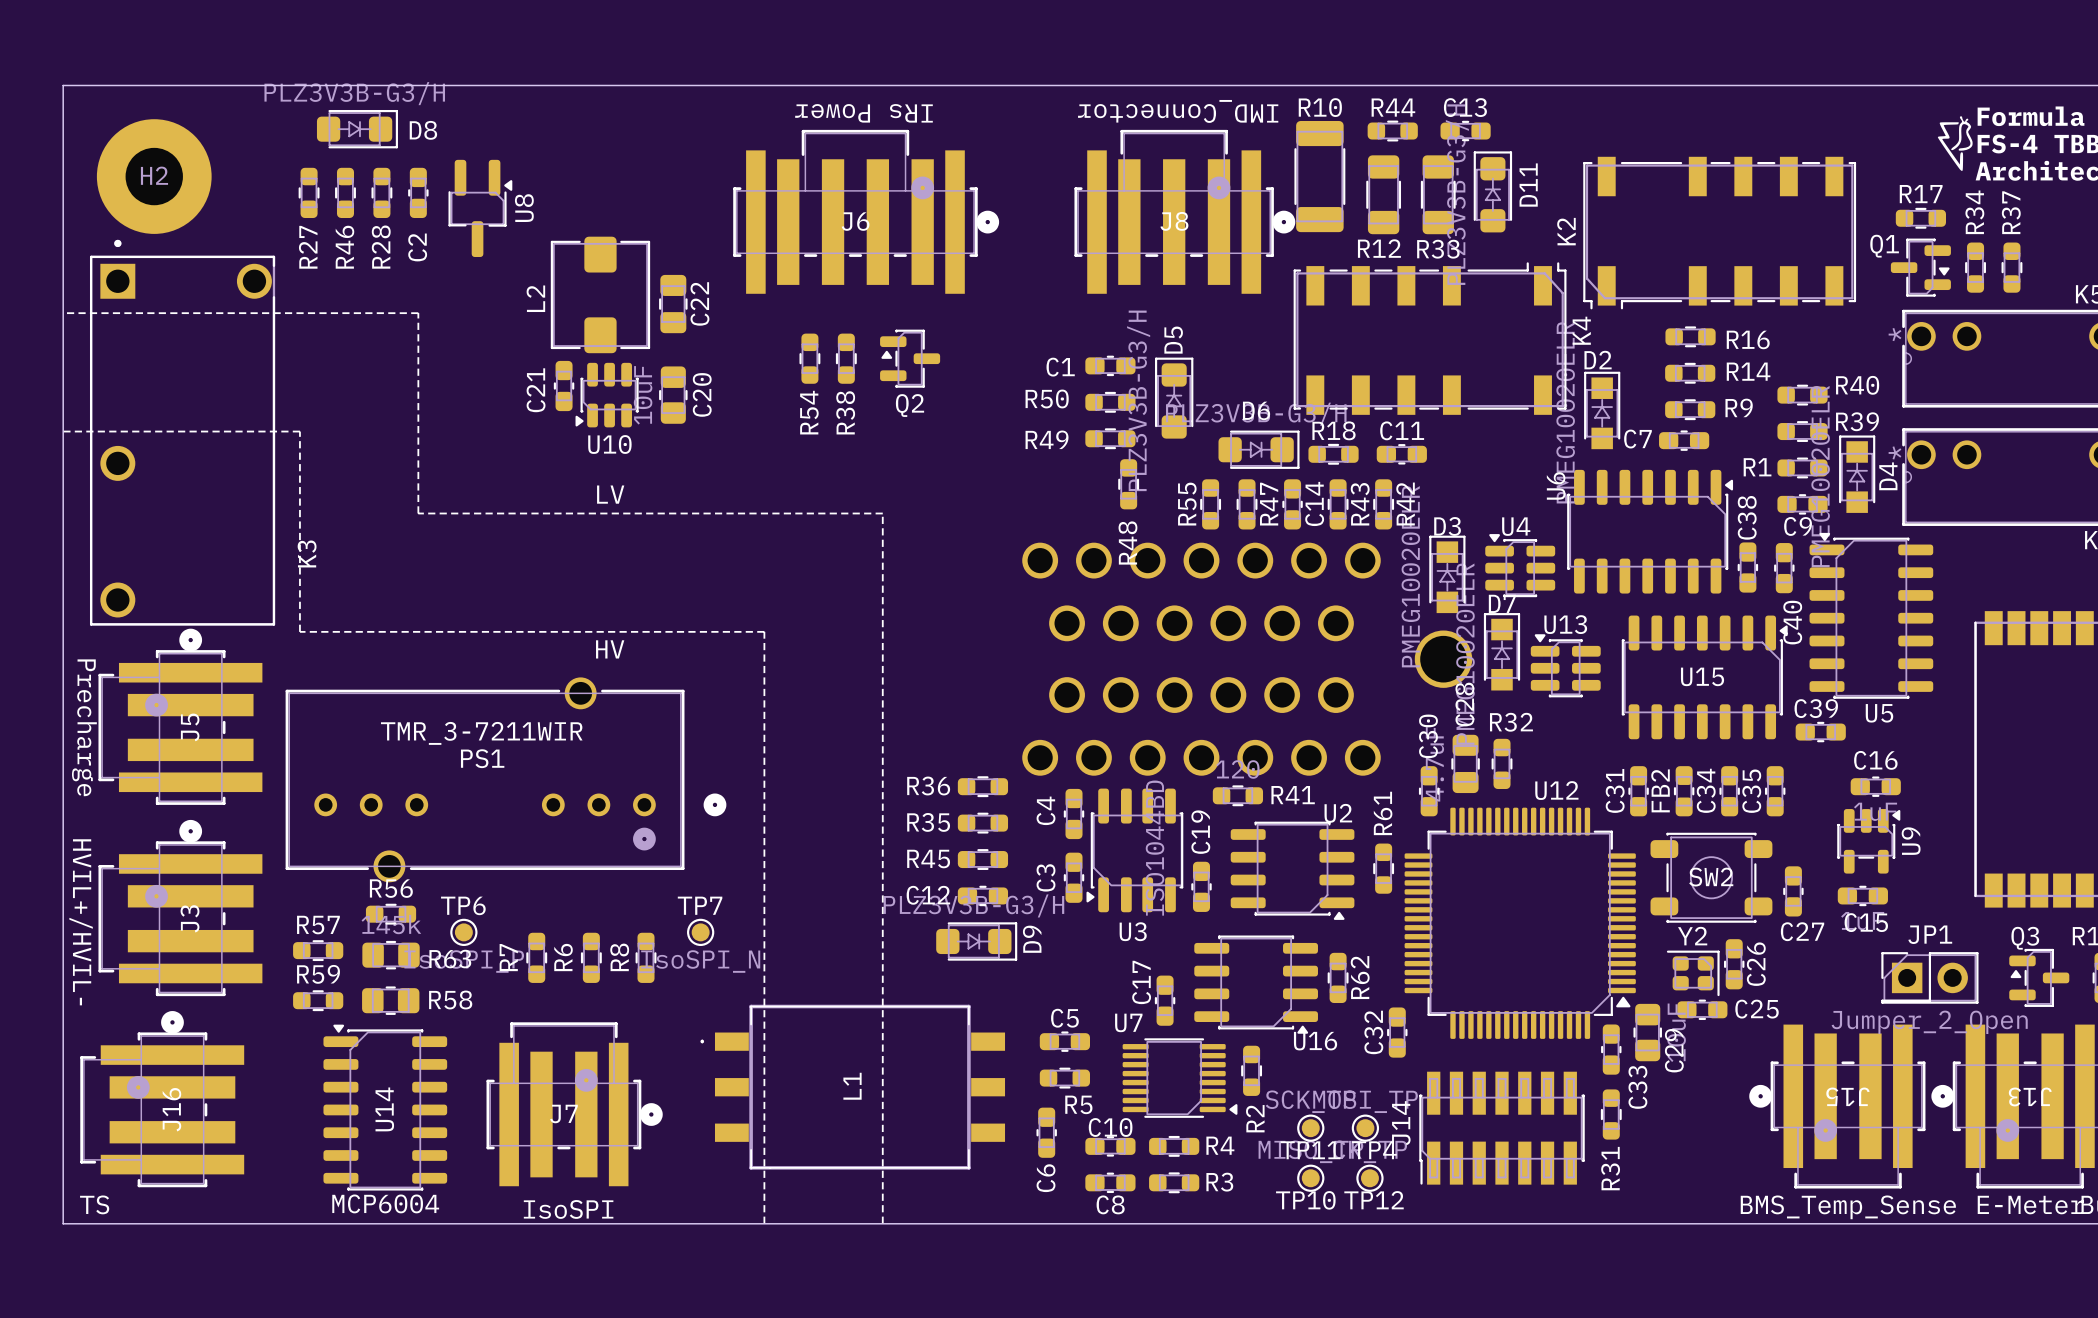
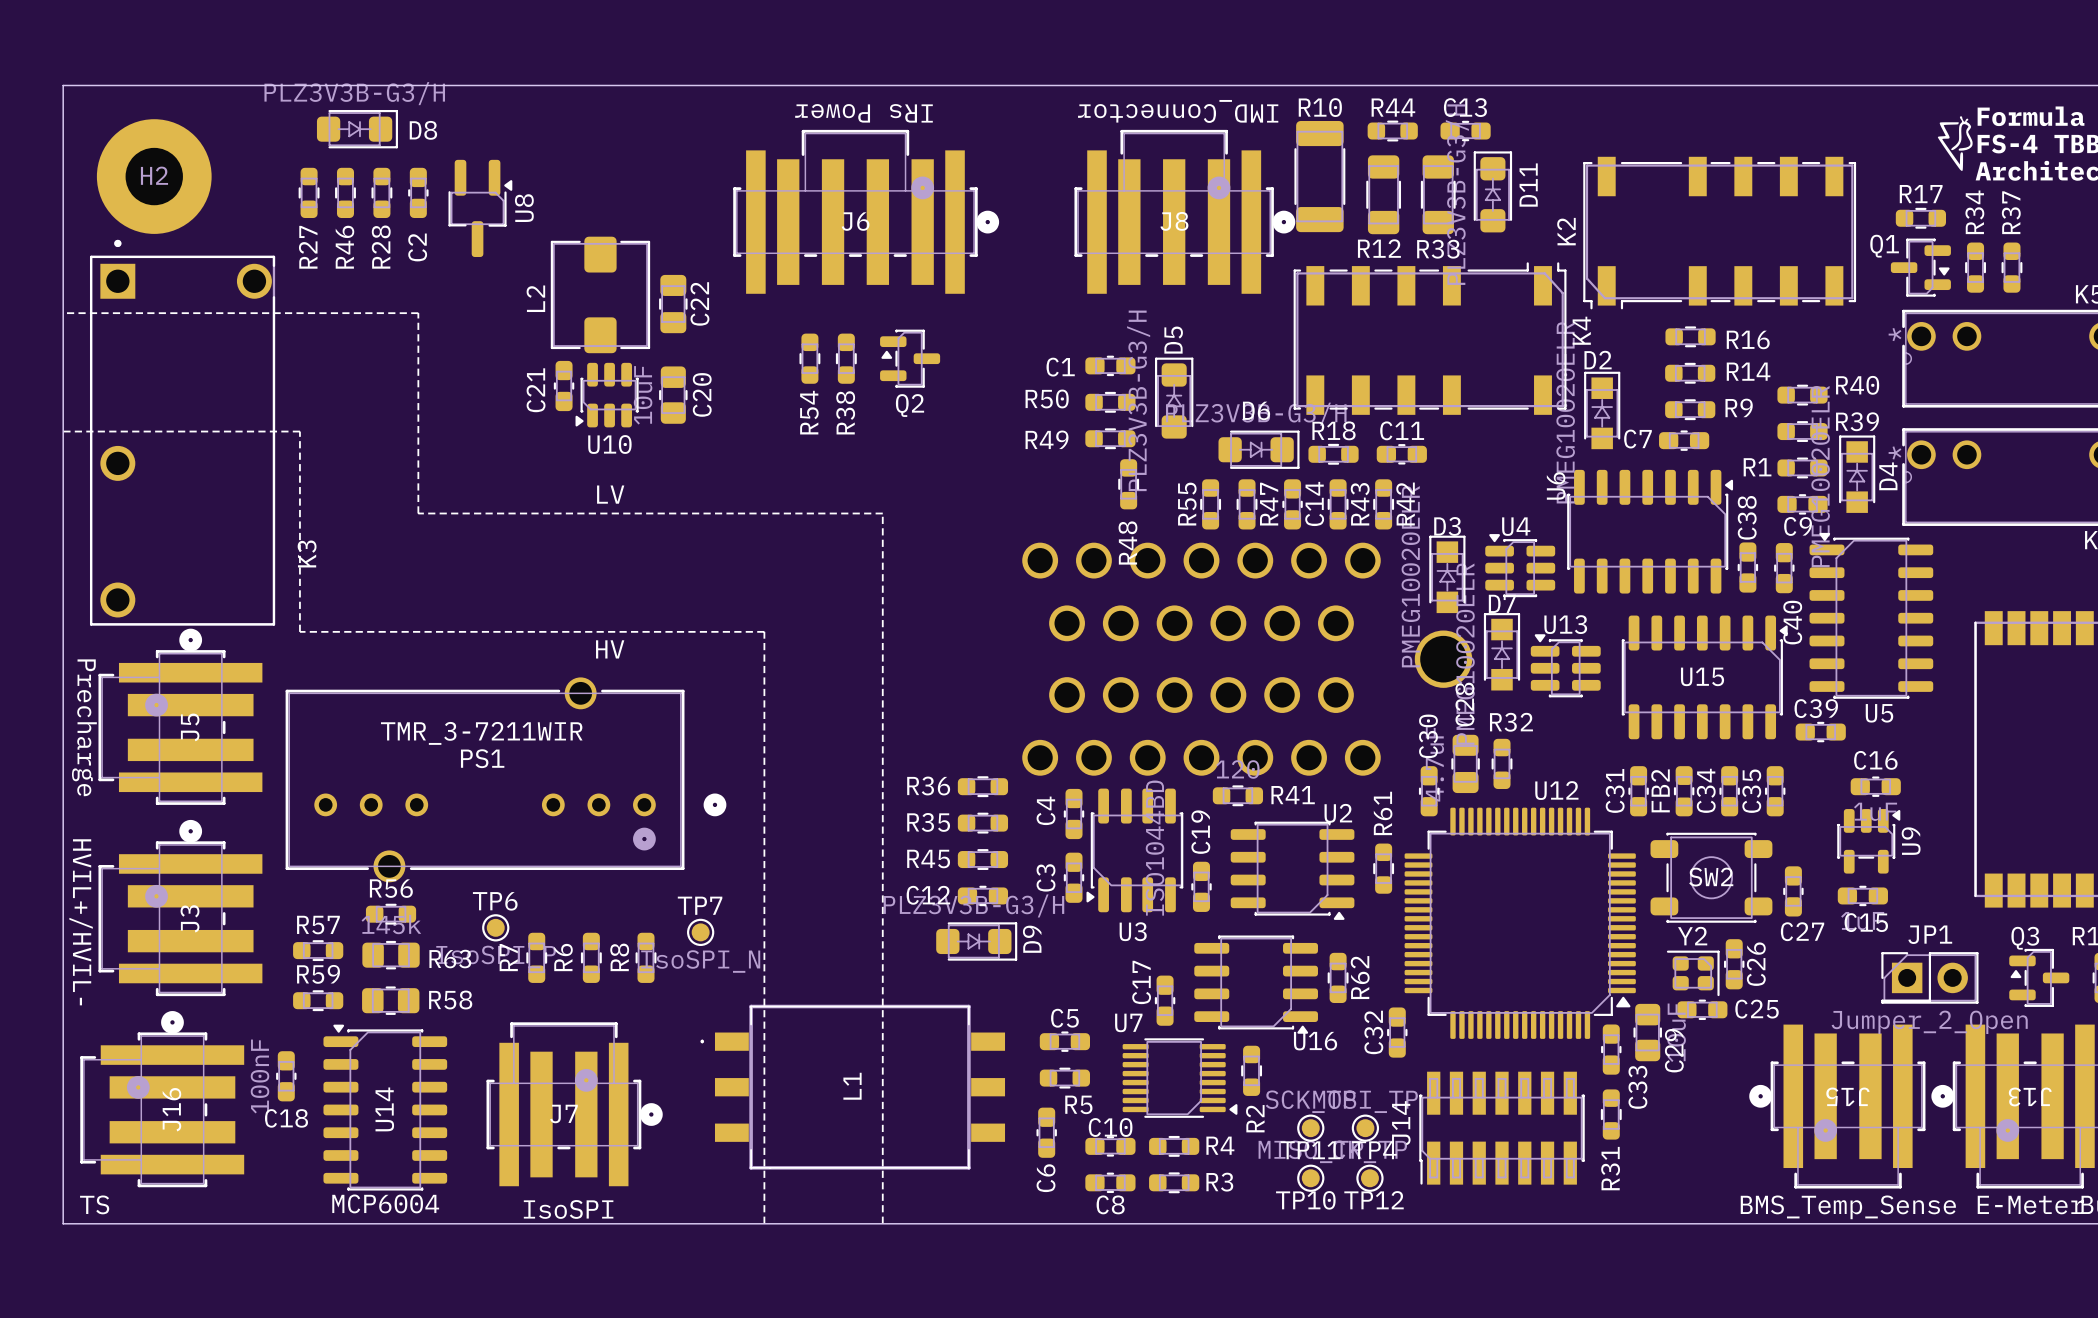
TP6 position: (463, 932) -> (495, 927)
C18: none -> 100nF (286, 1076)

